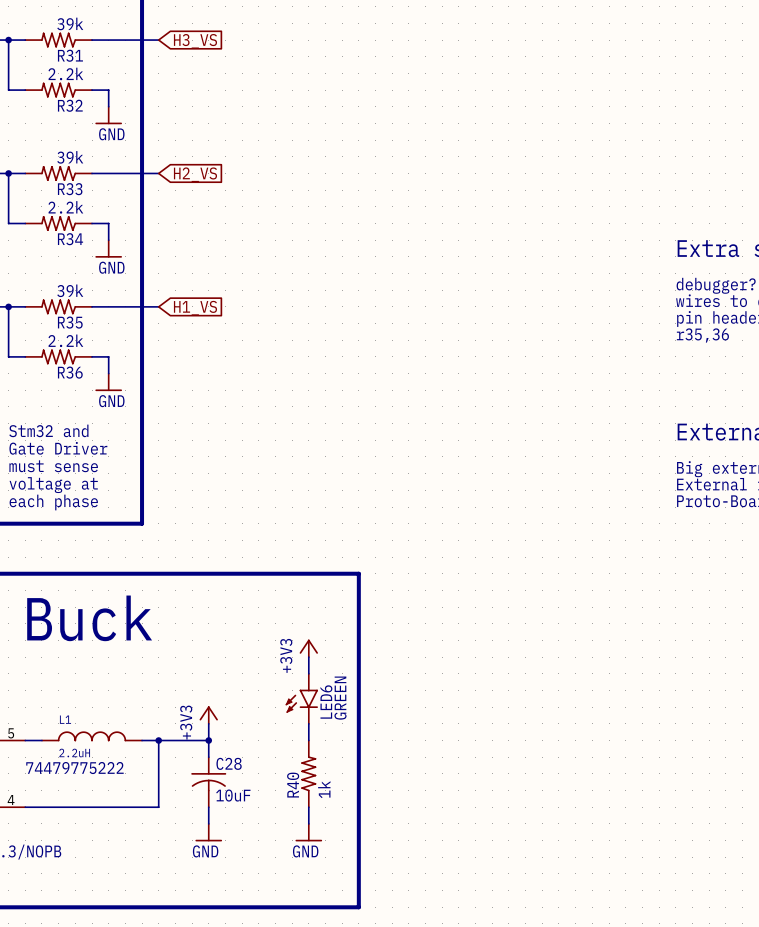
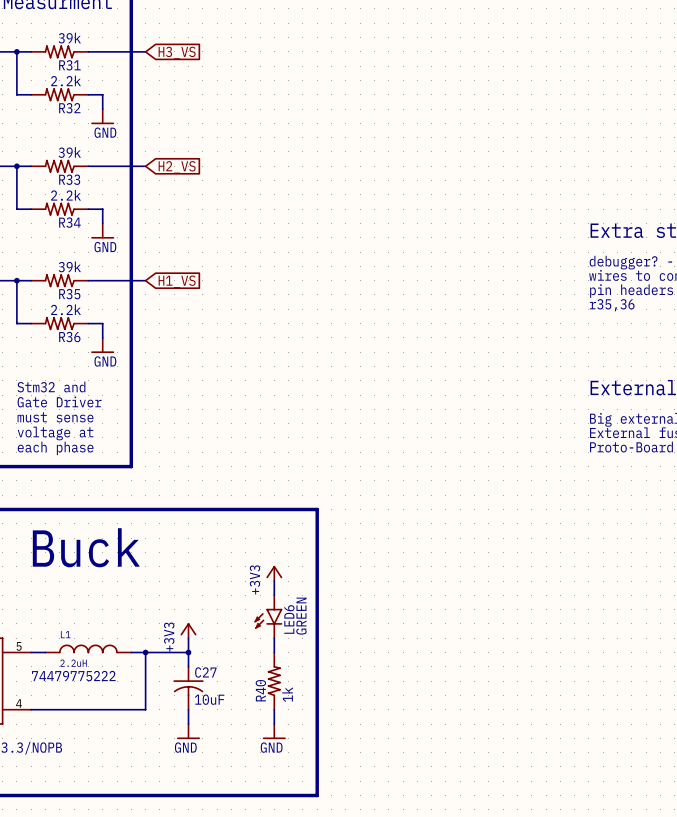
C28 name: C28 (229, 763) -> C27 (205, 672)

